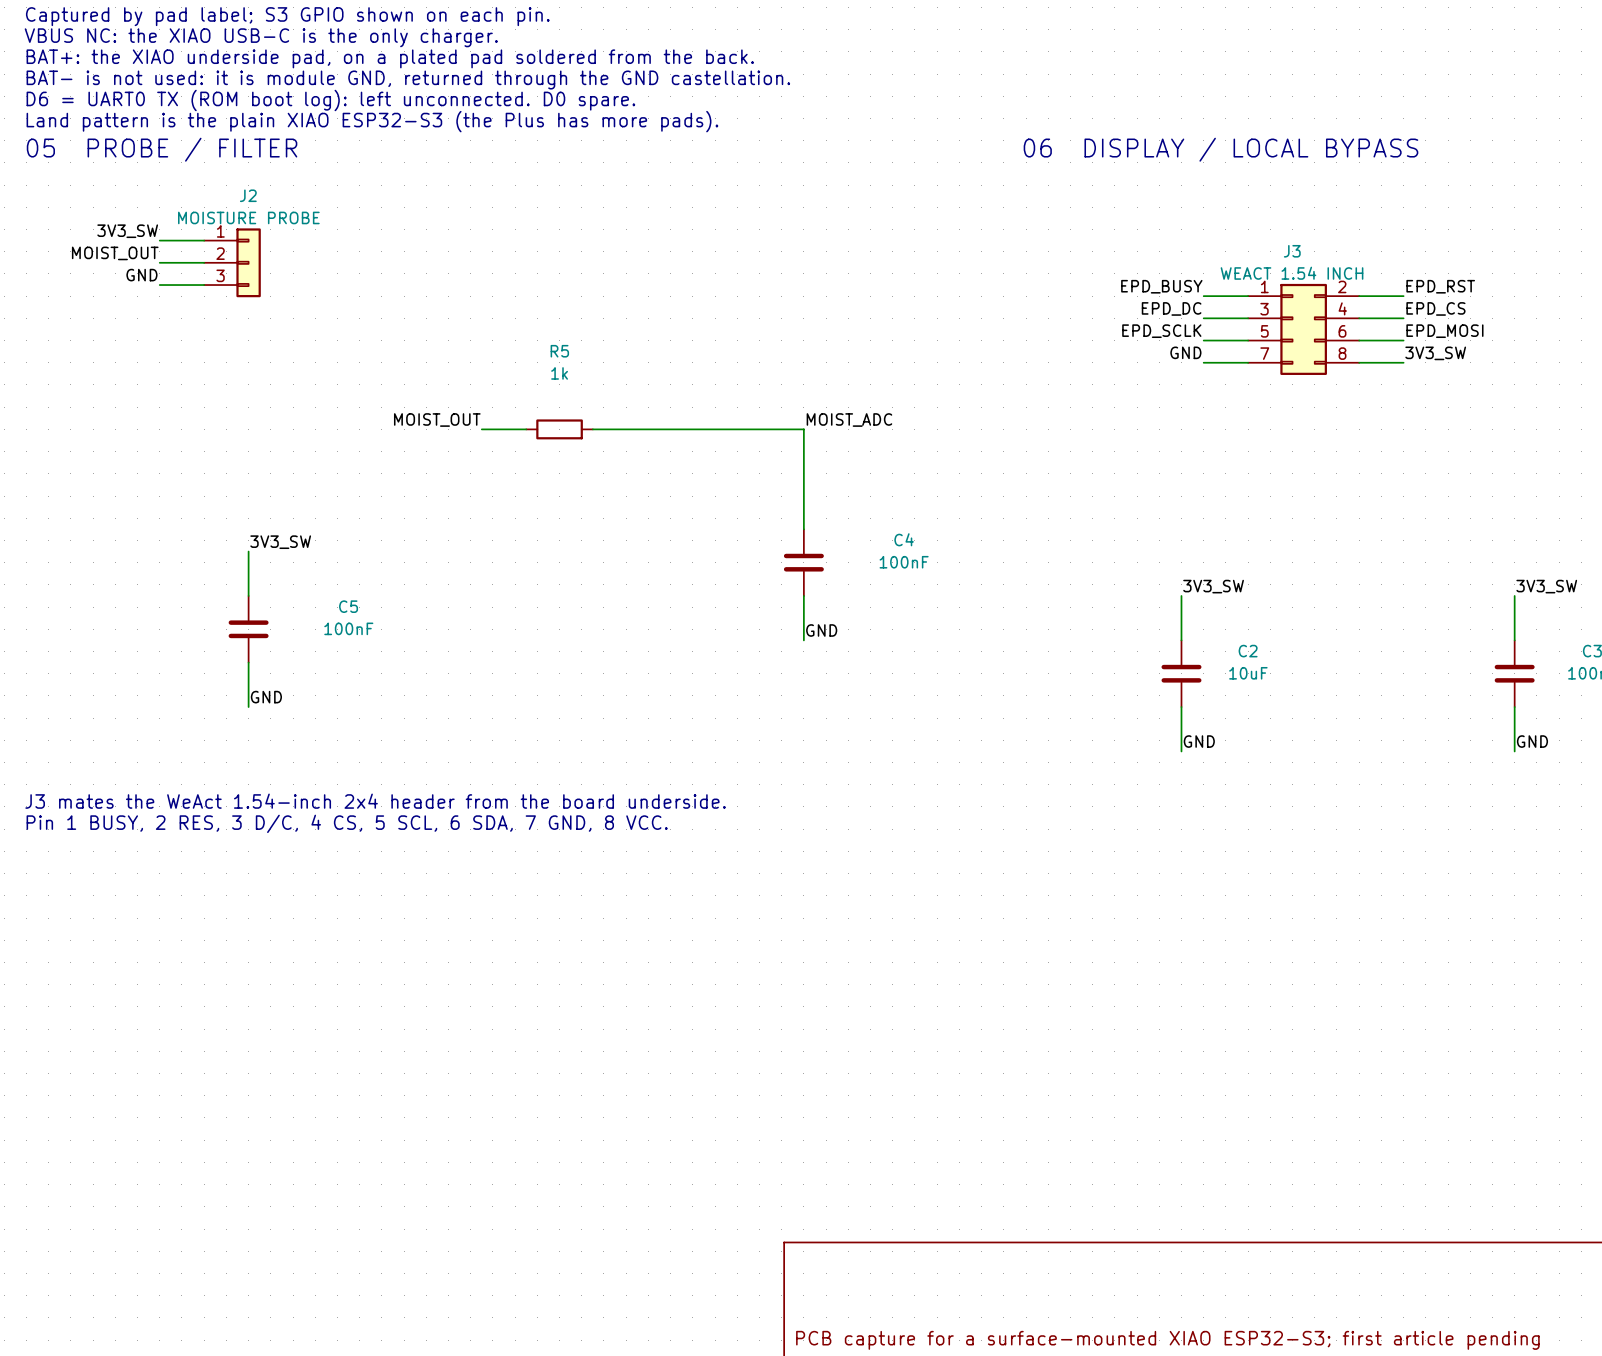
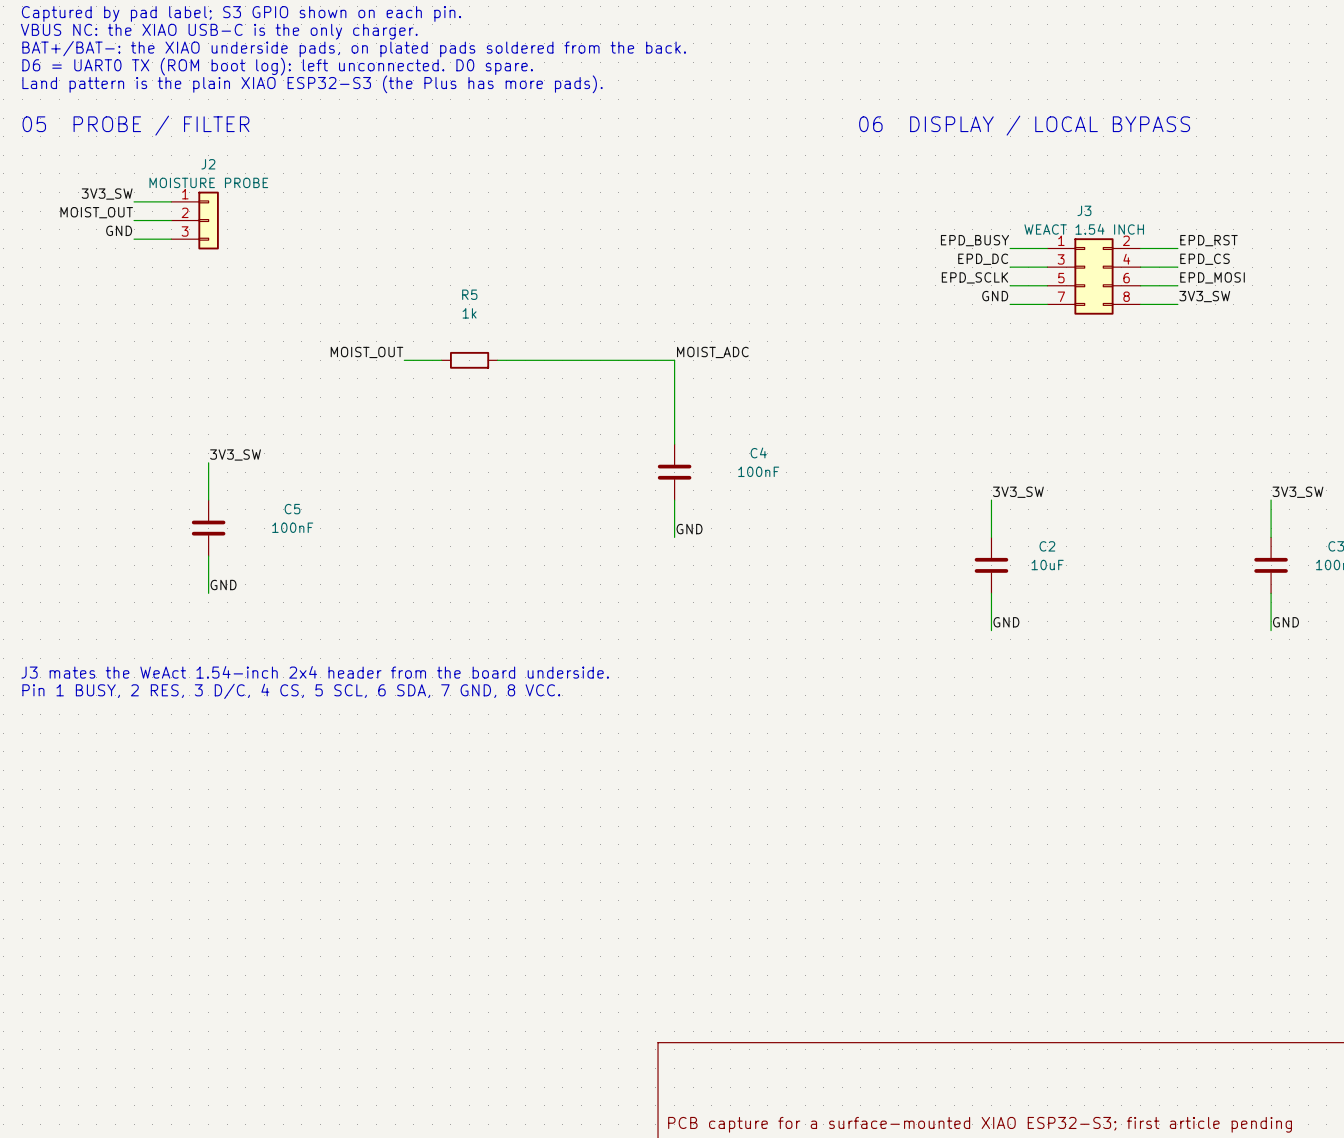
text: BAT+: the XIAO underside pad, on a plated pad soldered from the back. (390, 58) -> BAT+/BAT-: the XIAO underside pads, on plated pads soldered from the back. (354, 49)
text: BAT- is not used: it is module GND, returned through the GND castellation. (408, 80) -> D6 = UART0 TX (ROM boot log): left unconnected. D0 spare. (277, 66)
text: D6 = UART0 TX (ROM boot log): left unconnected. D0 spare. (330, 100) -> Land pattern is the plain XIAO ESP32-S3 (the Plus has more pads). (312, 84)
text: Land pattern is the plain XIAO ESP32-S3 (the Plus has more pads). (372, 121) -> none

